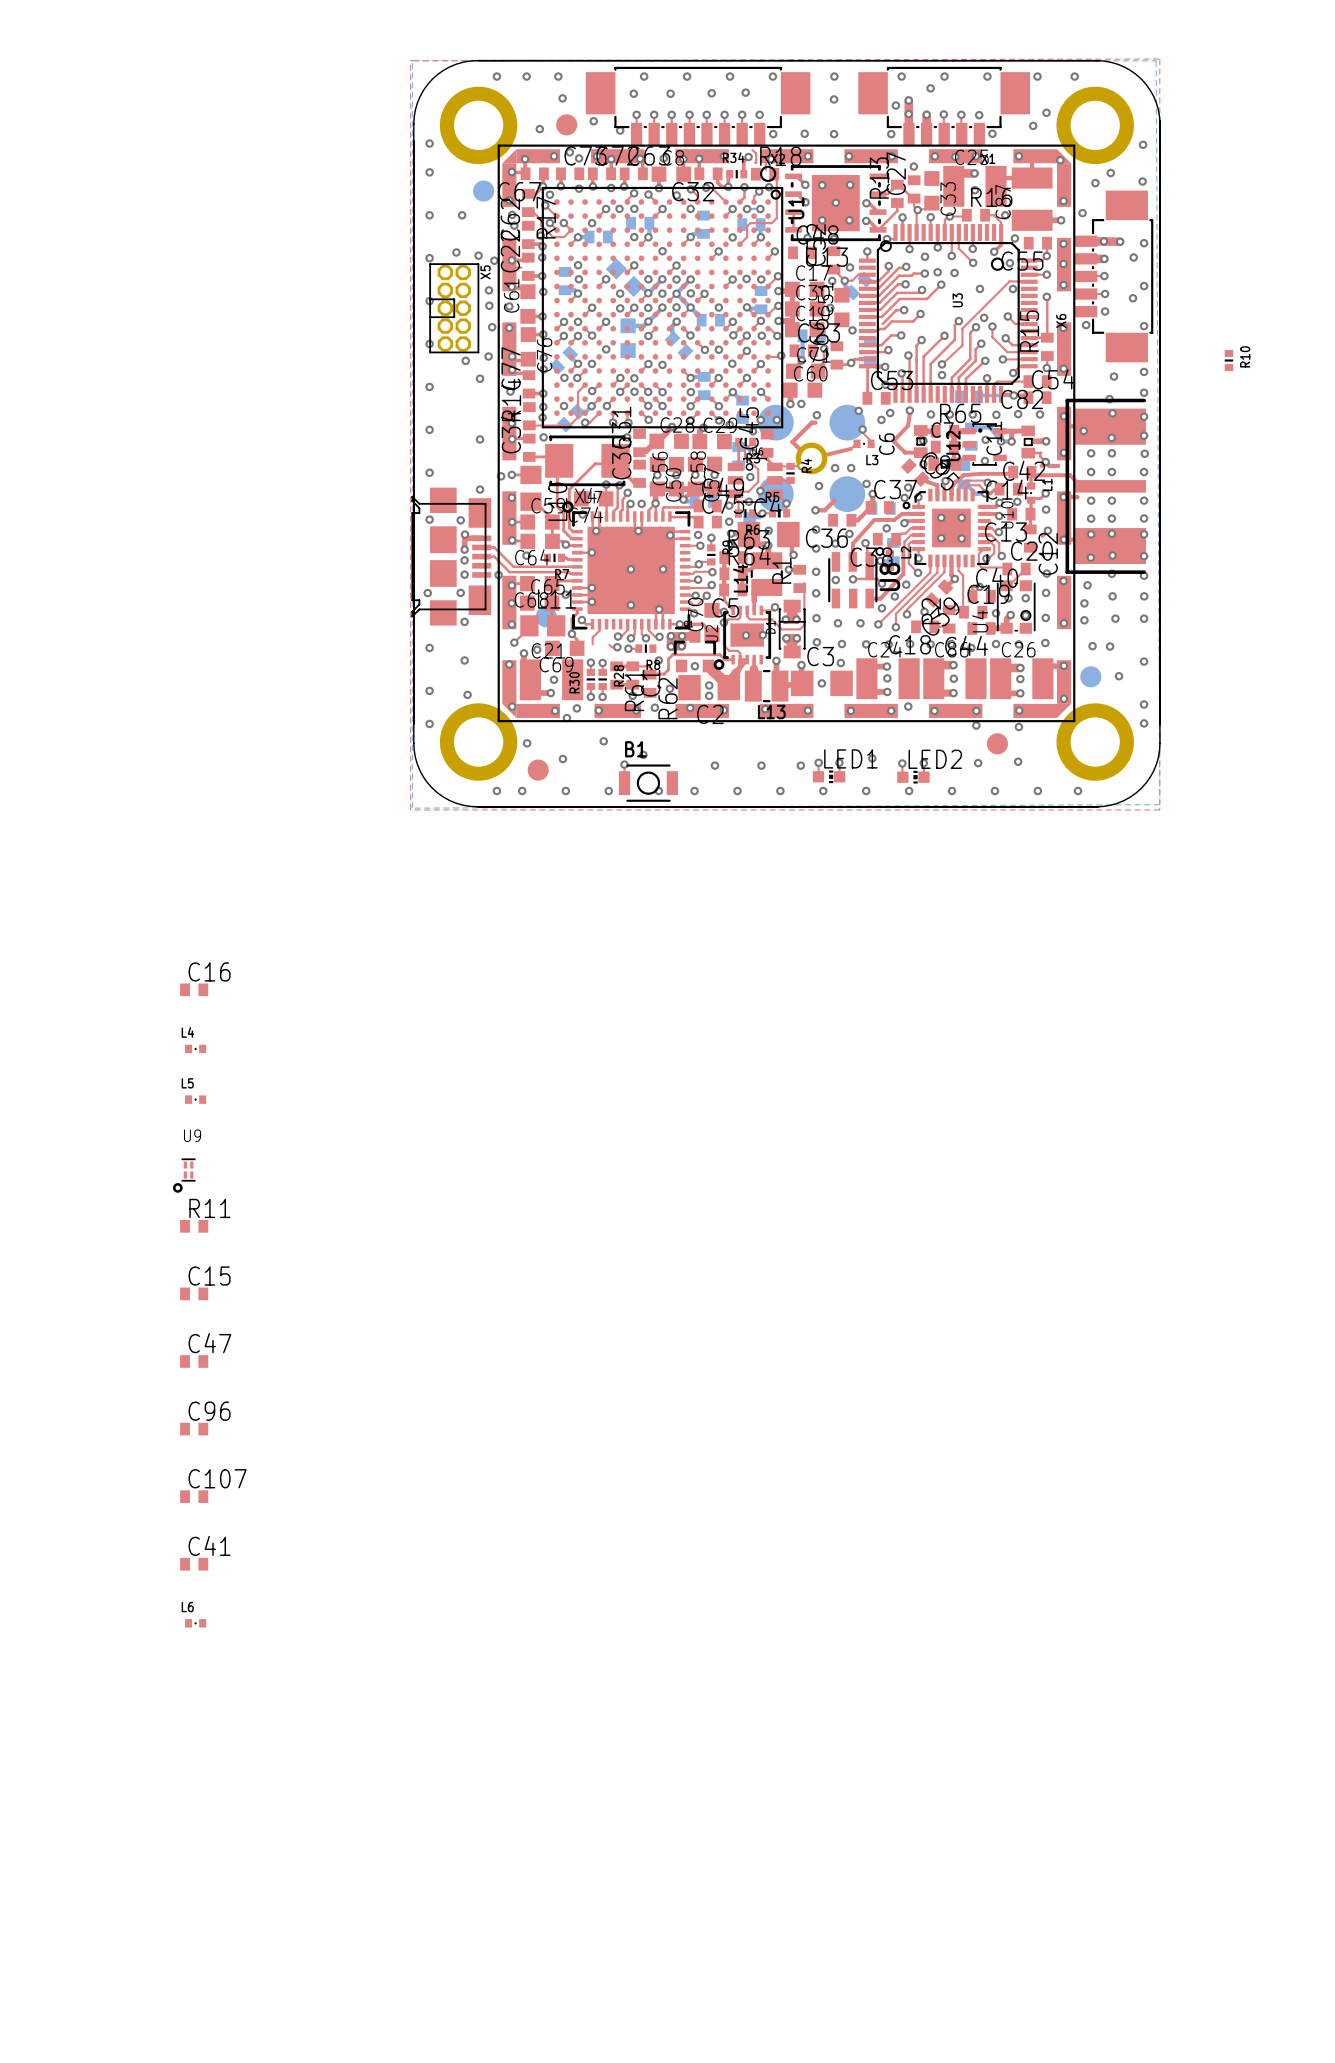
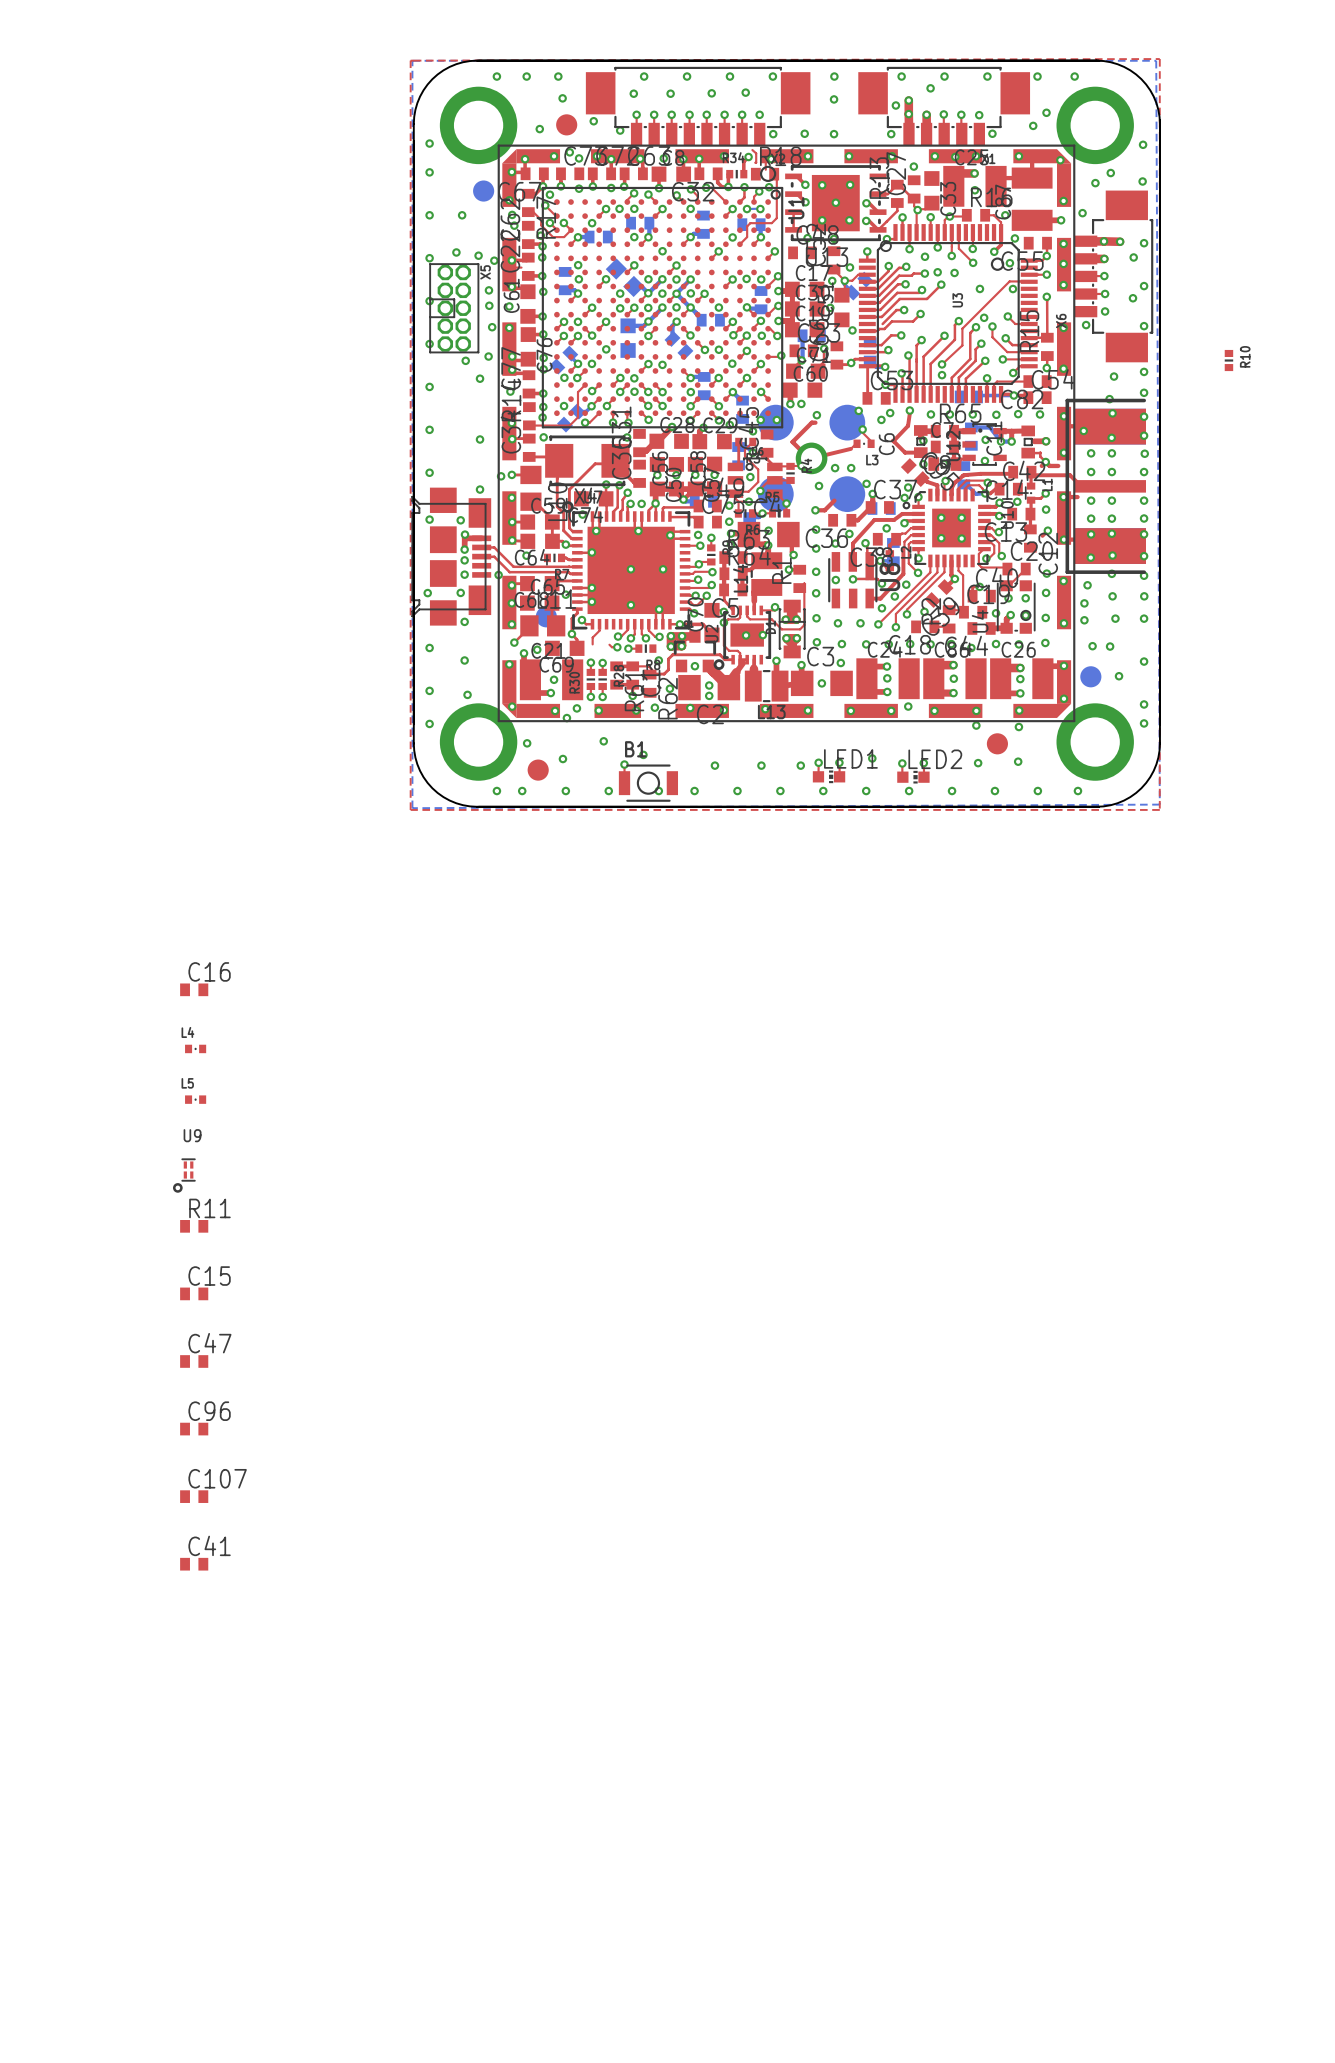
L6: (195, 1623) -> none

